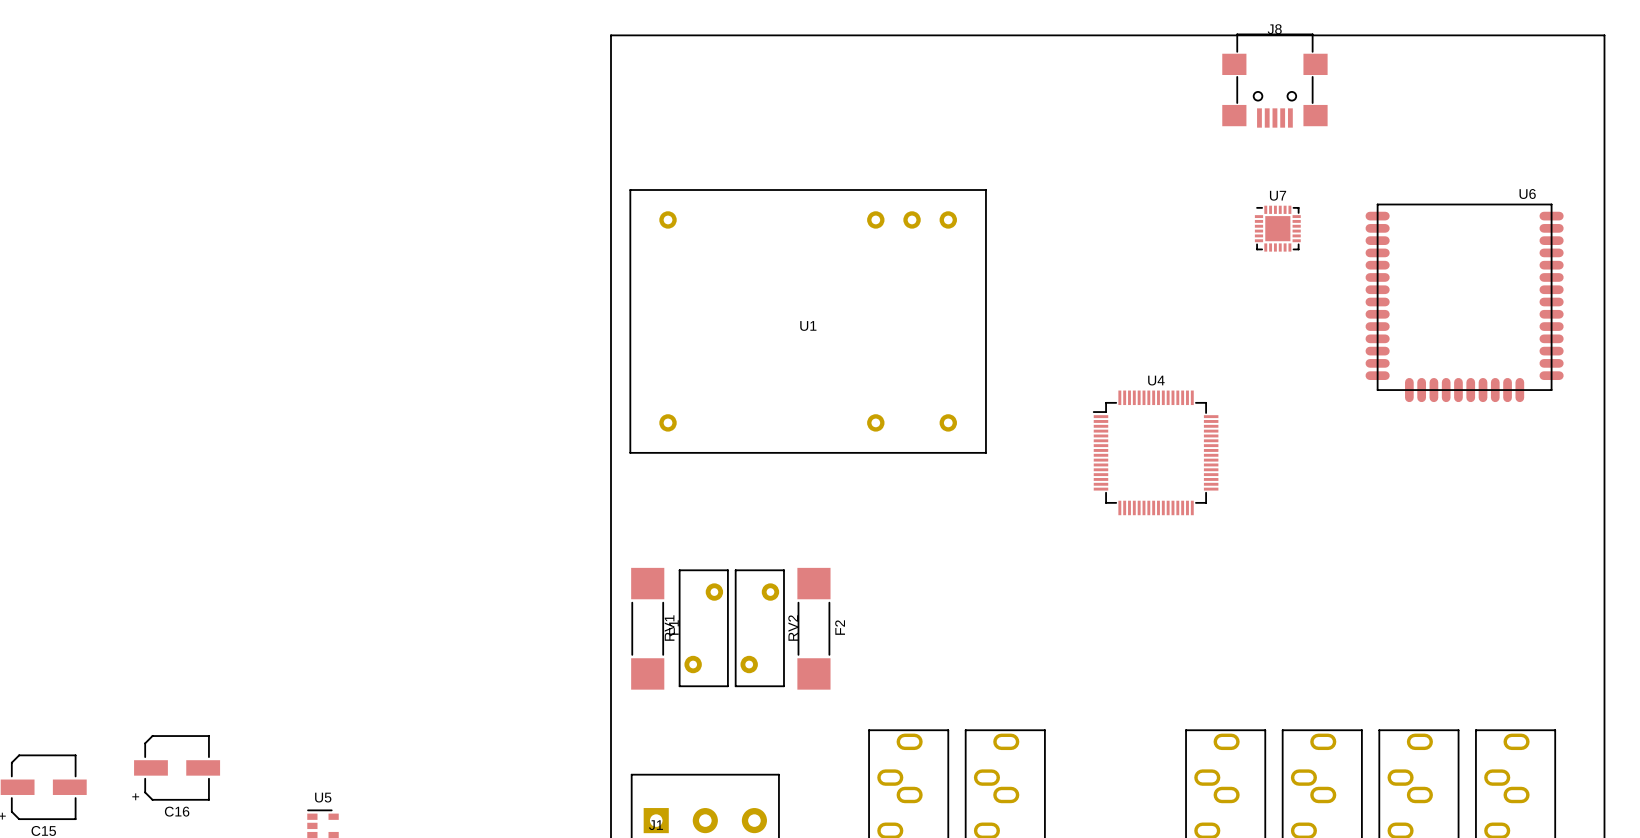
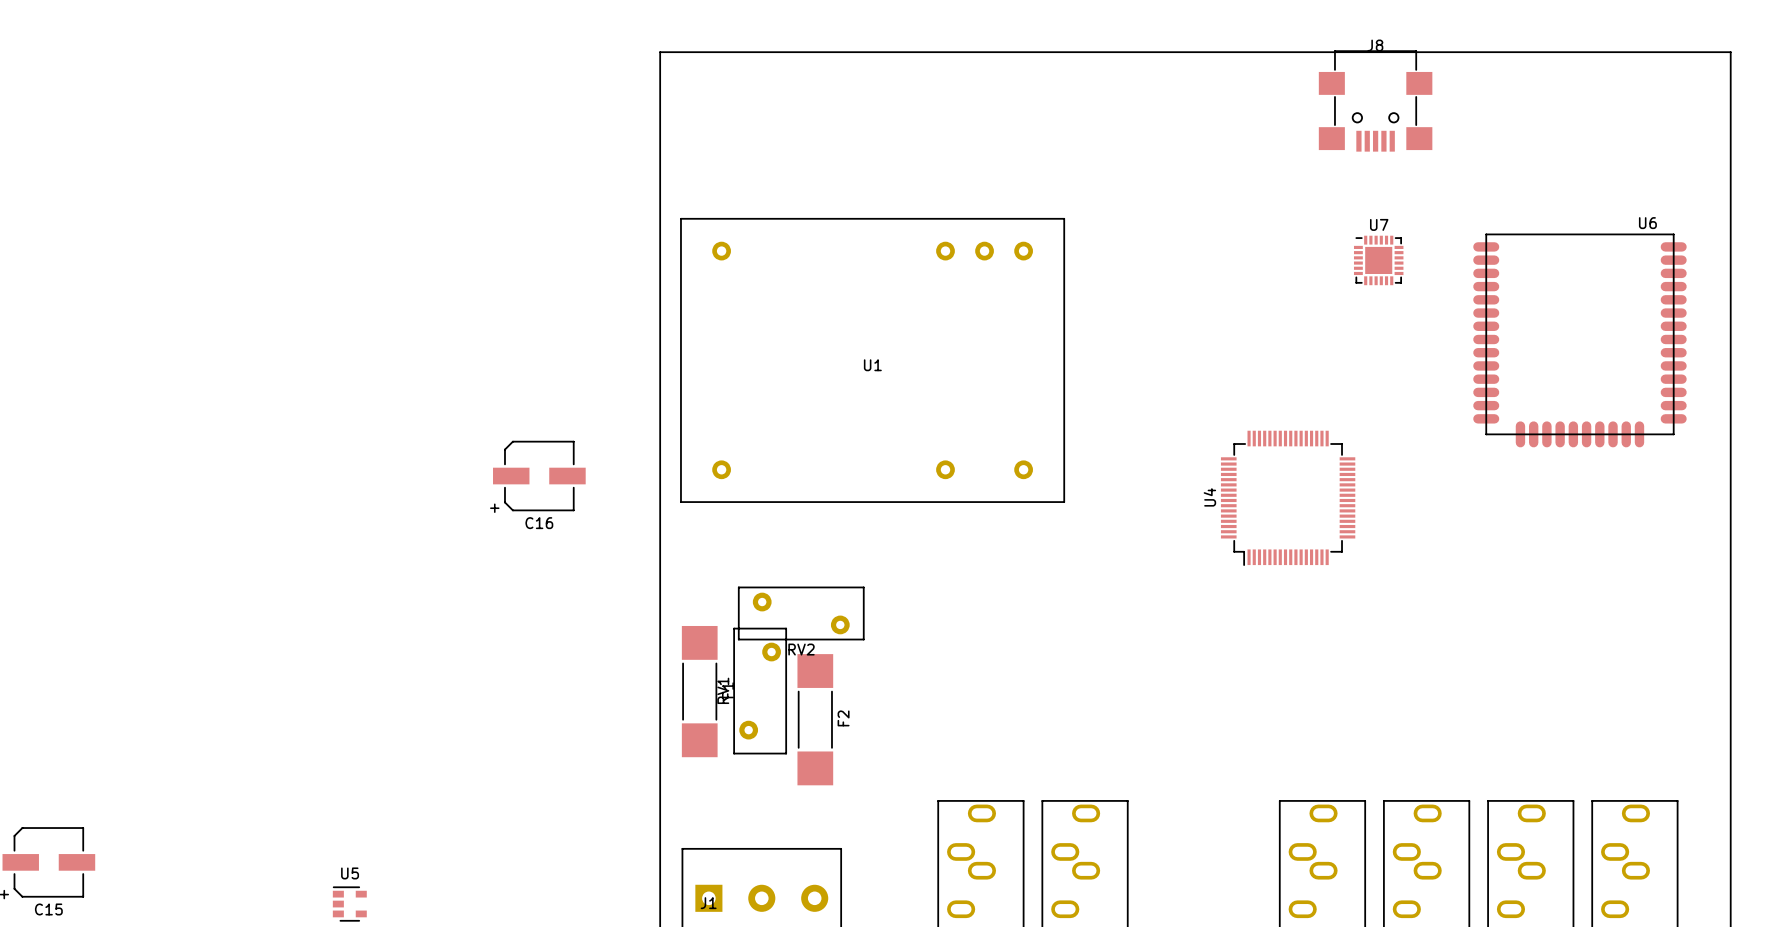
U4 rotation: 0° (1155, 452) -> 90° counterclockwise (1288, 498)
RV2 rotation: 0° (759, 628) -> 90° clockwise (801, 613)
RV2 position: (759, 628) -> (801, 613)
F2 position: (813, 628) -> (815, 719)
C16 position: (177, 767) -> (539, 476)

